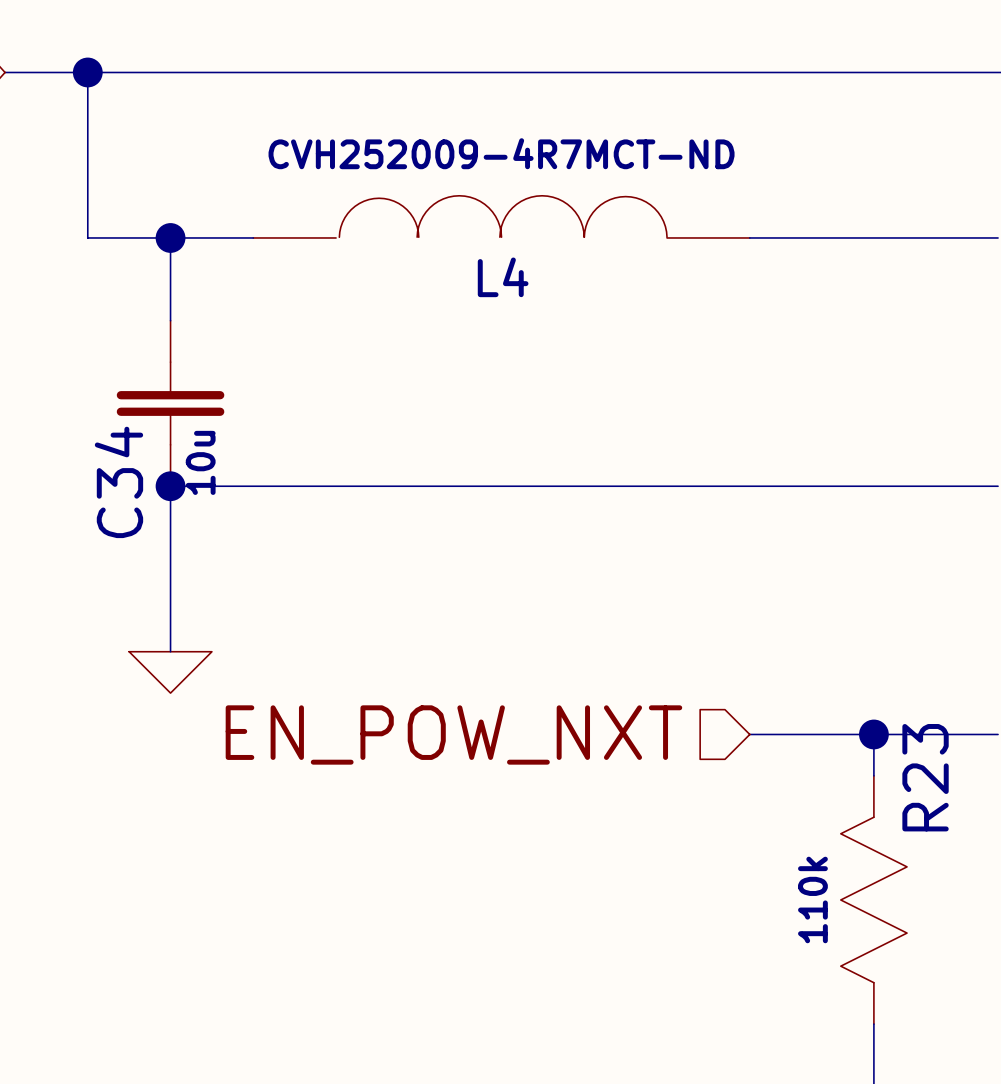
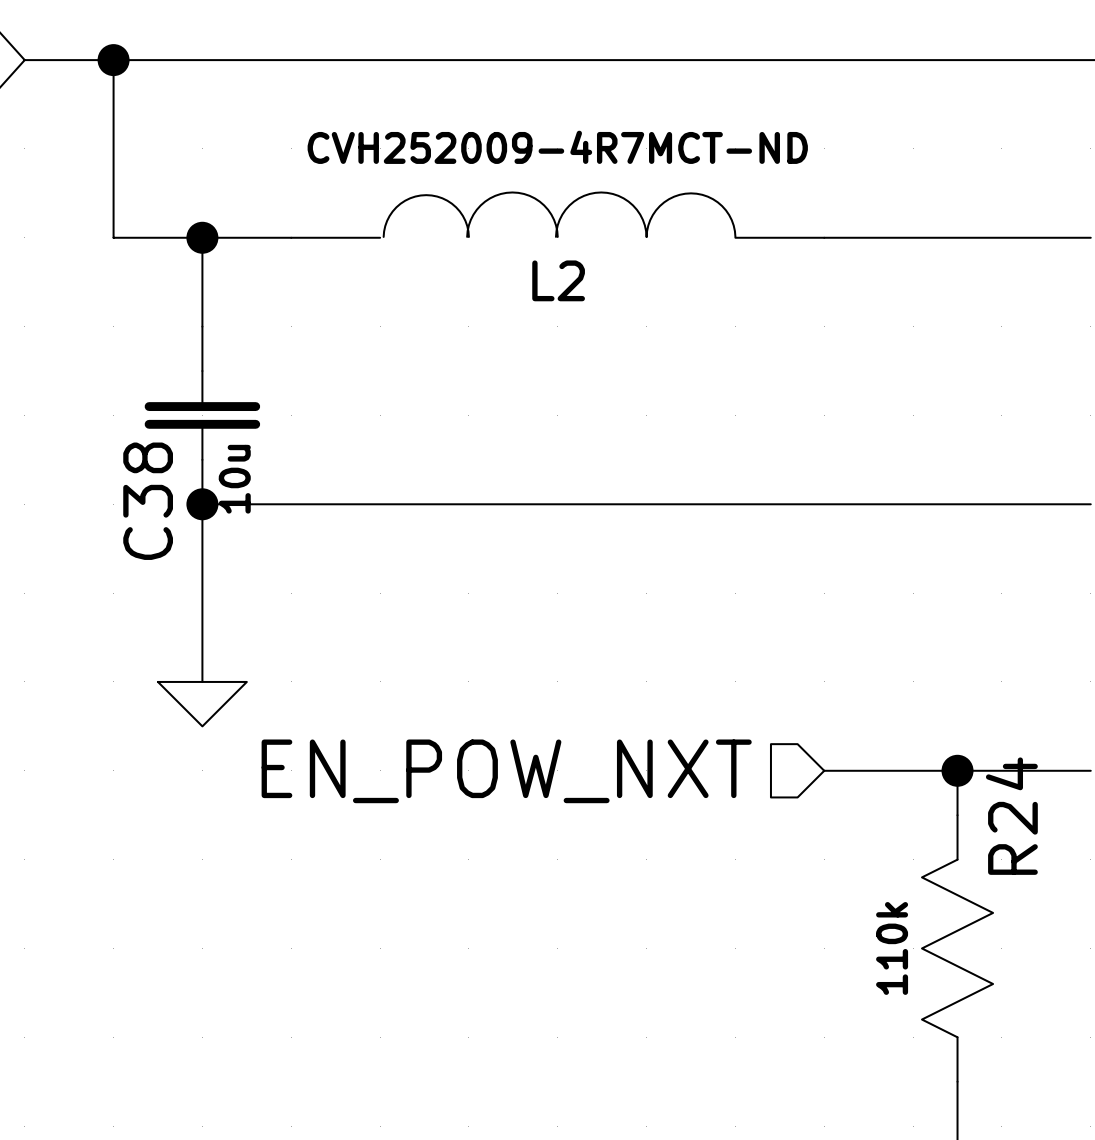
L4 name: L4 (503, 277) -> L2 (558, 280)
C34 name: C34 (118, 482) -> C38 (148, 501)
R23 name: R23 (925, 777) -> R24 (1011, 816)

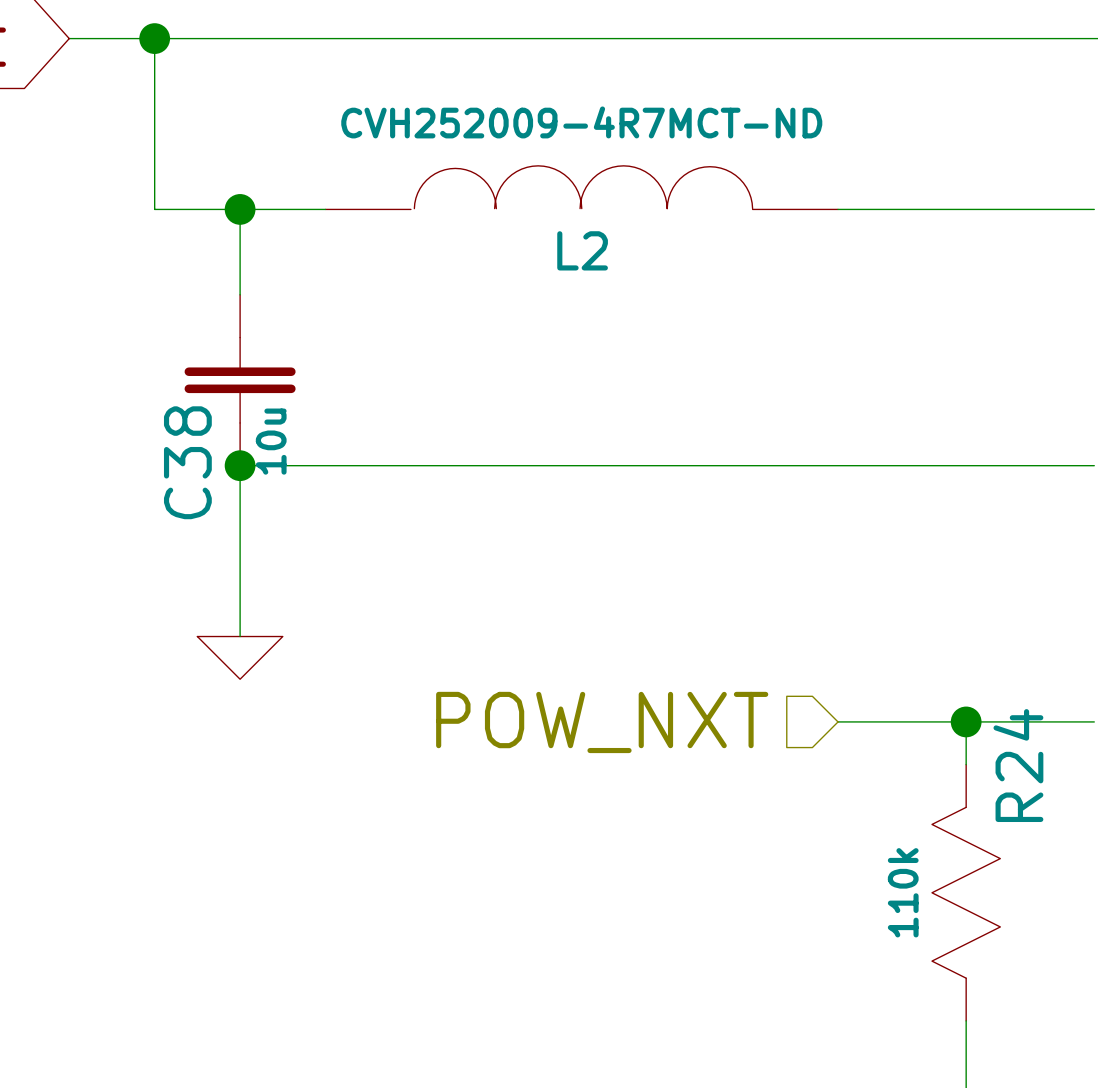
hierarchical label: EN_POW_NXT (506, 771) -> POW_NXT (602, 722)

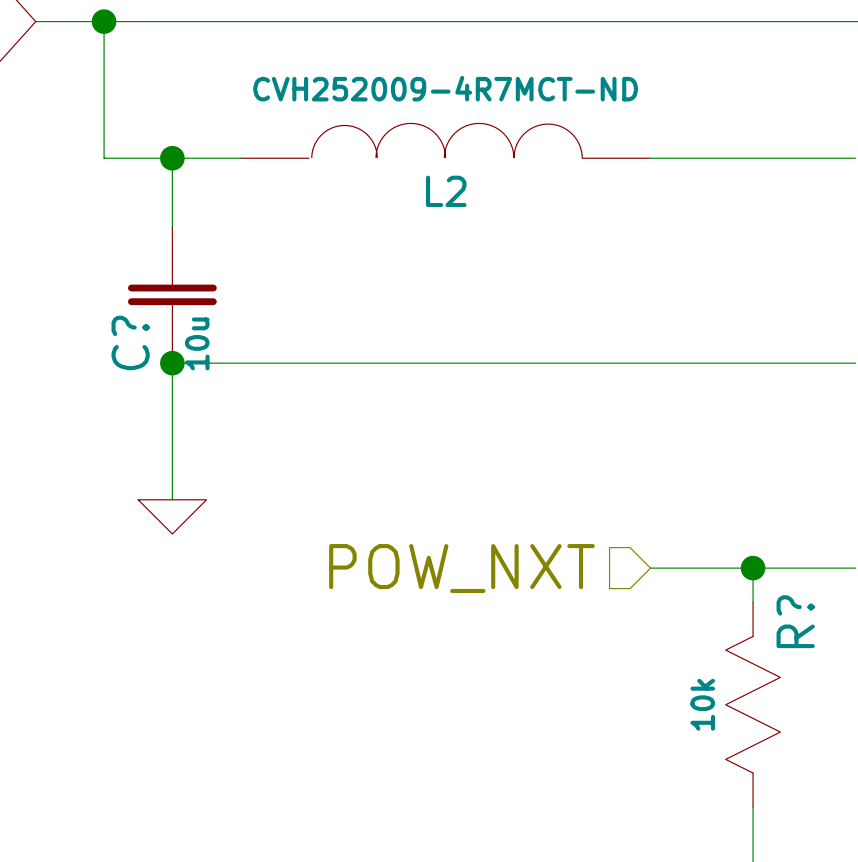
C38 name: C38 (187, 462) -> C? (130, 342)
R24 name: R24 (1018, 765) -> R? (795, 621)
R24 value: 110k (903, 892) -> 10k (702, 704)

